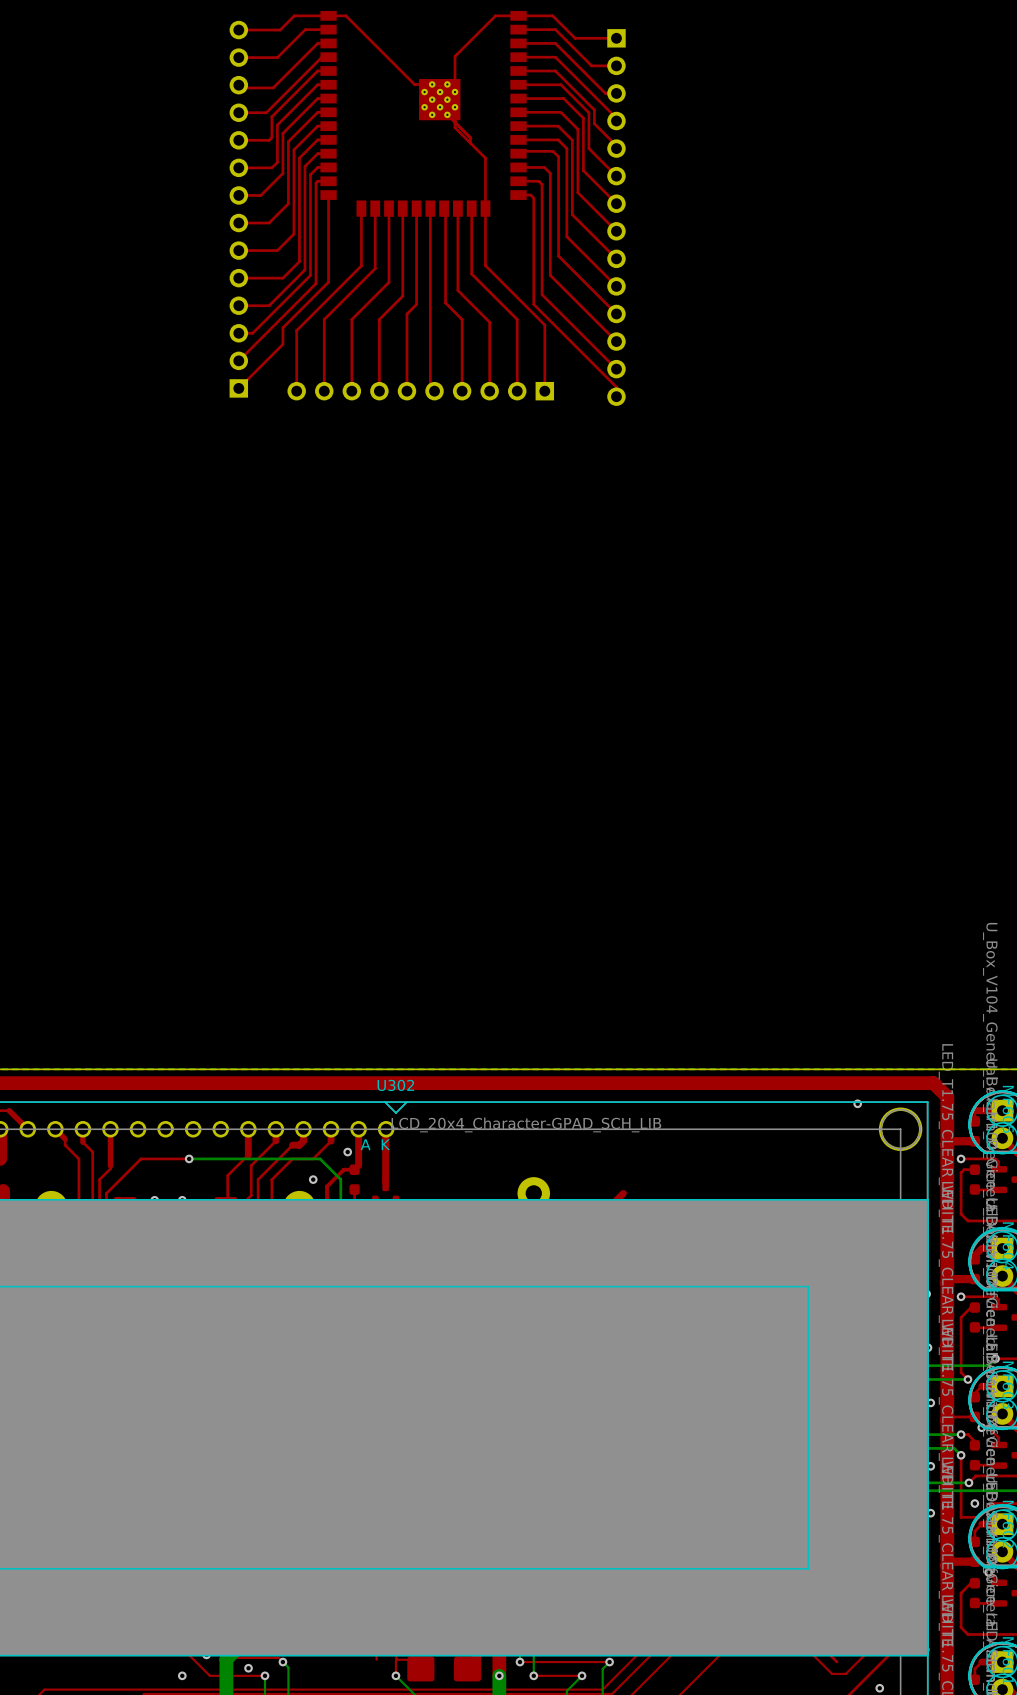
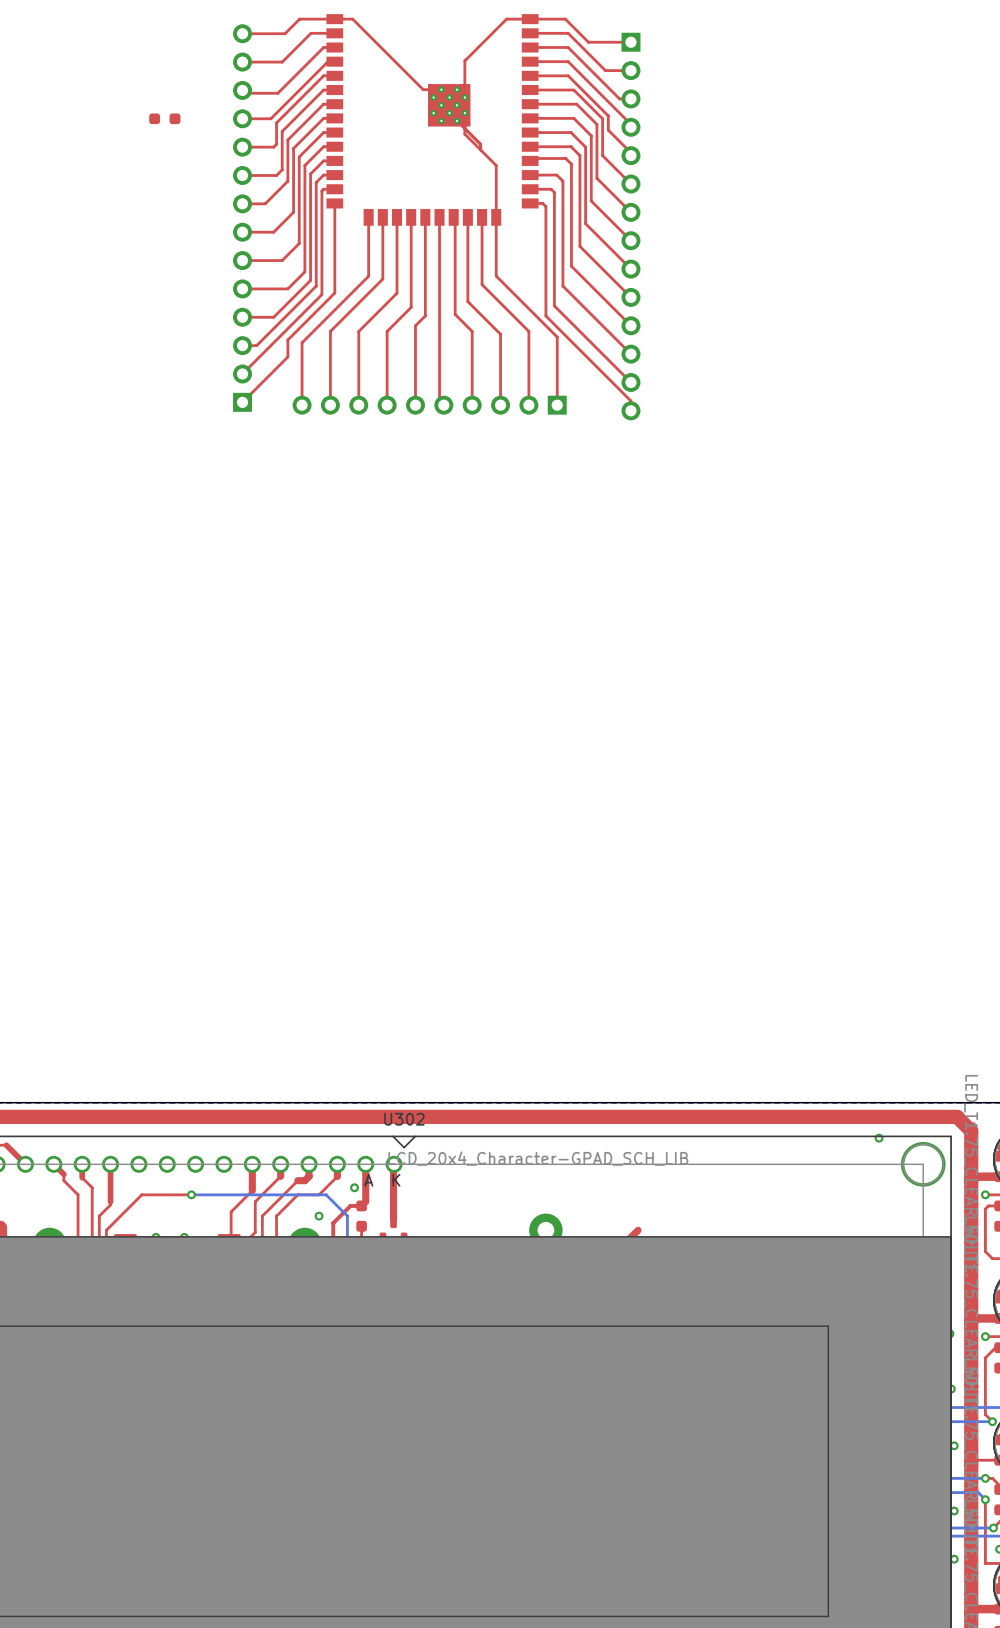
part: none -> (164, 118)

